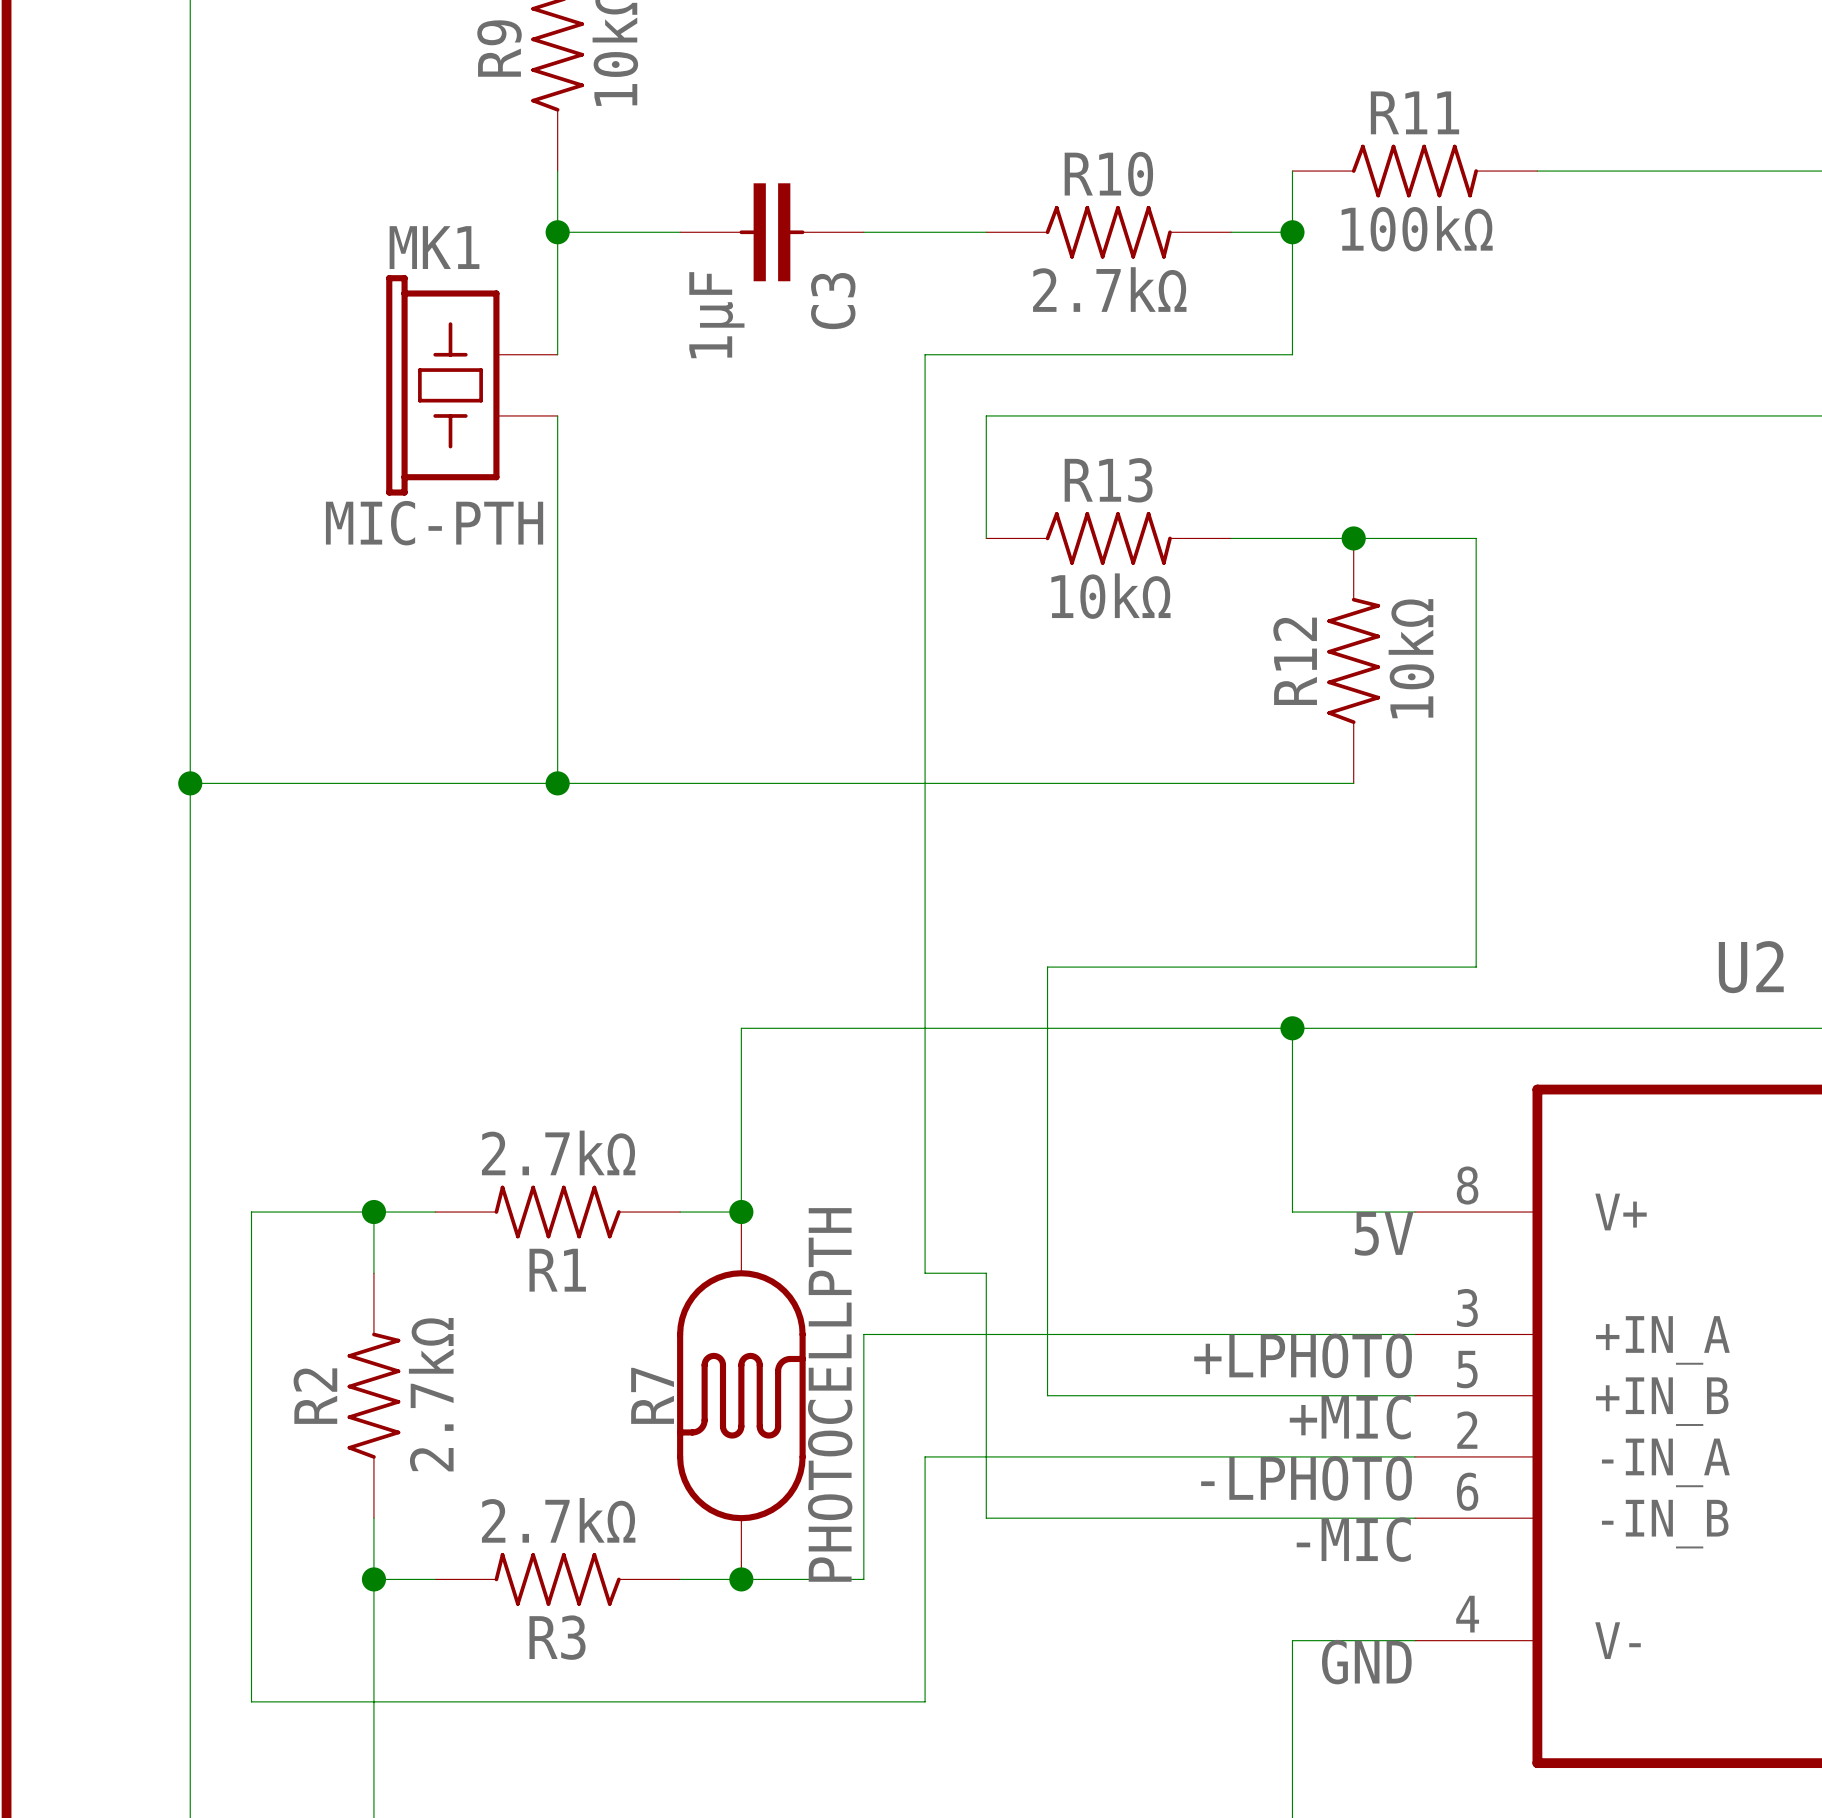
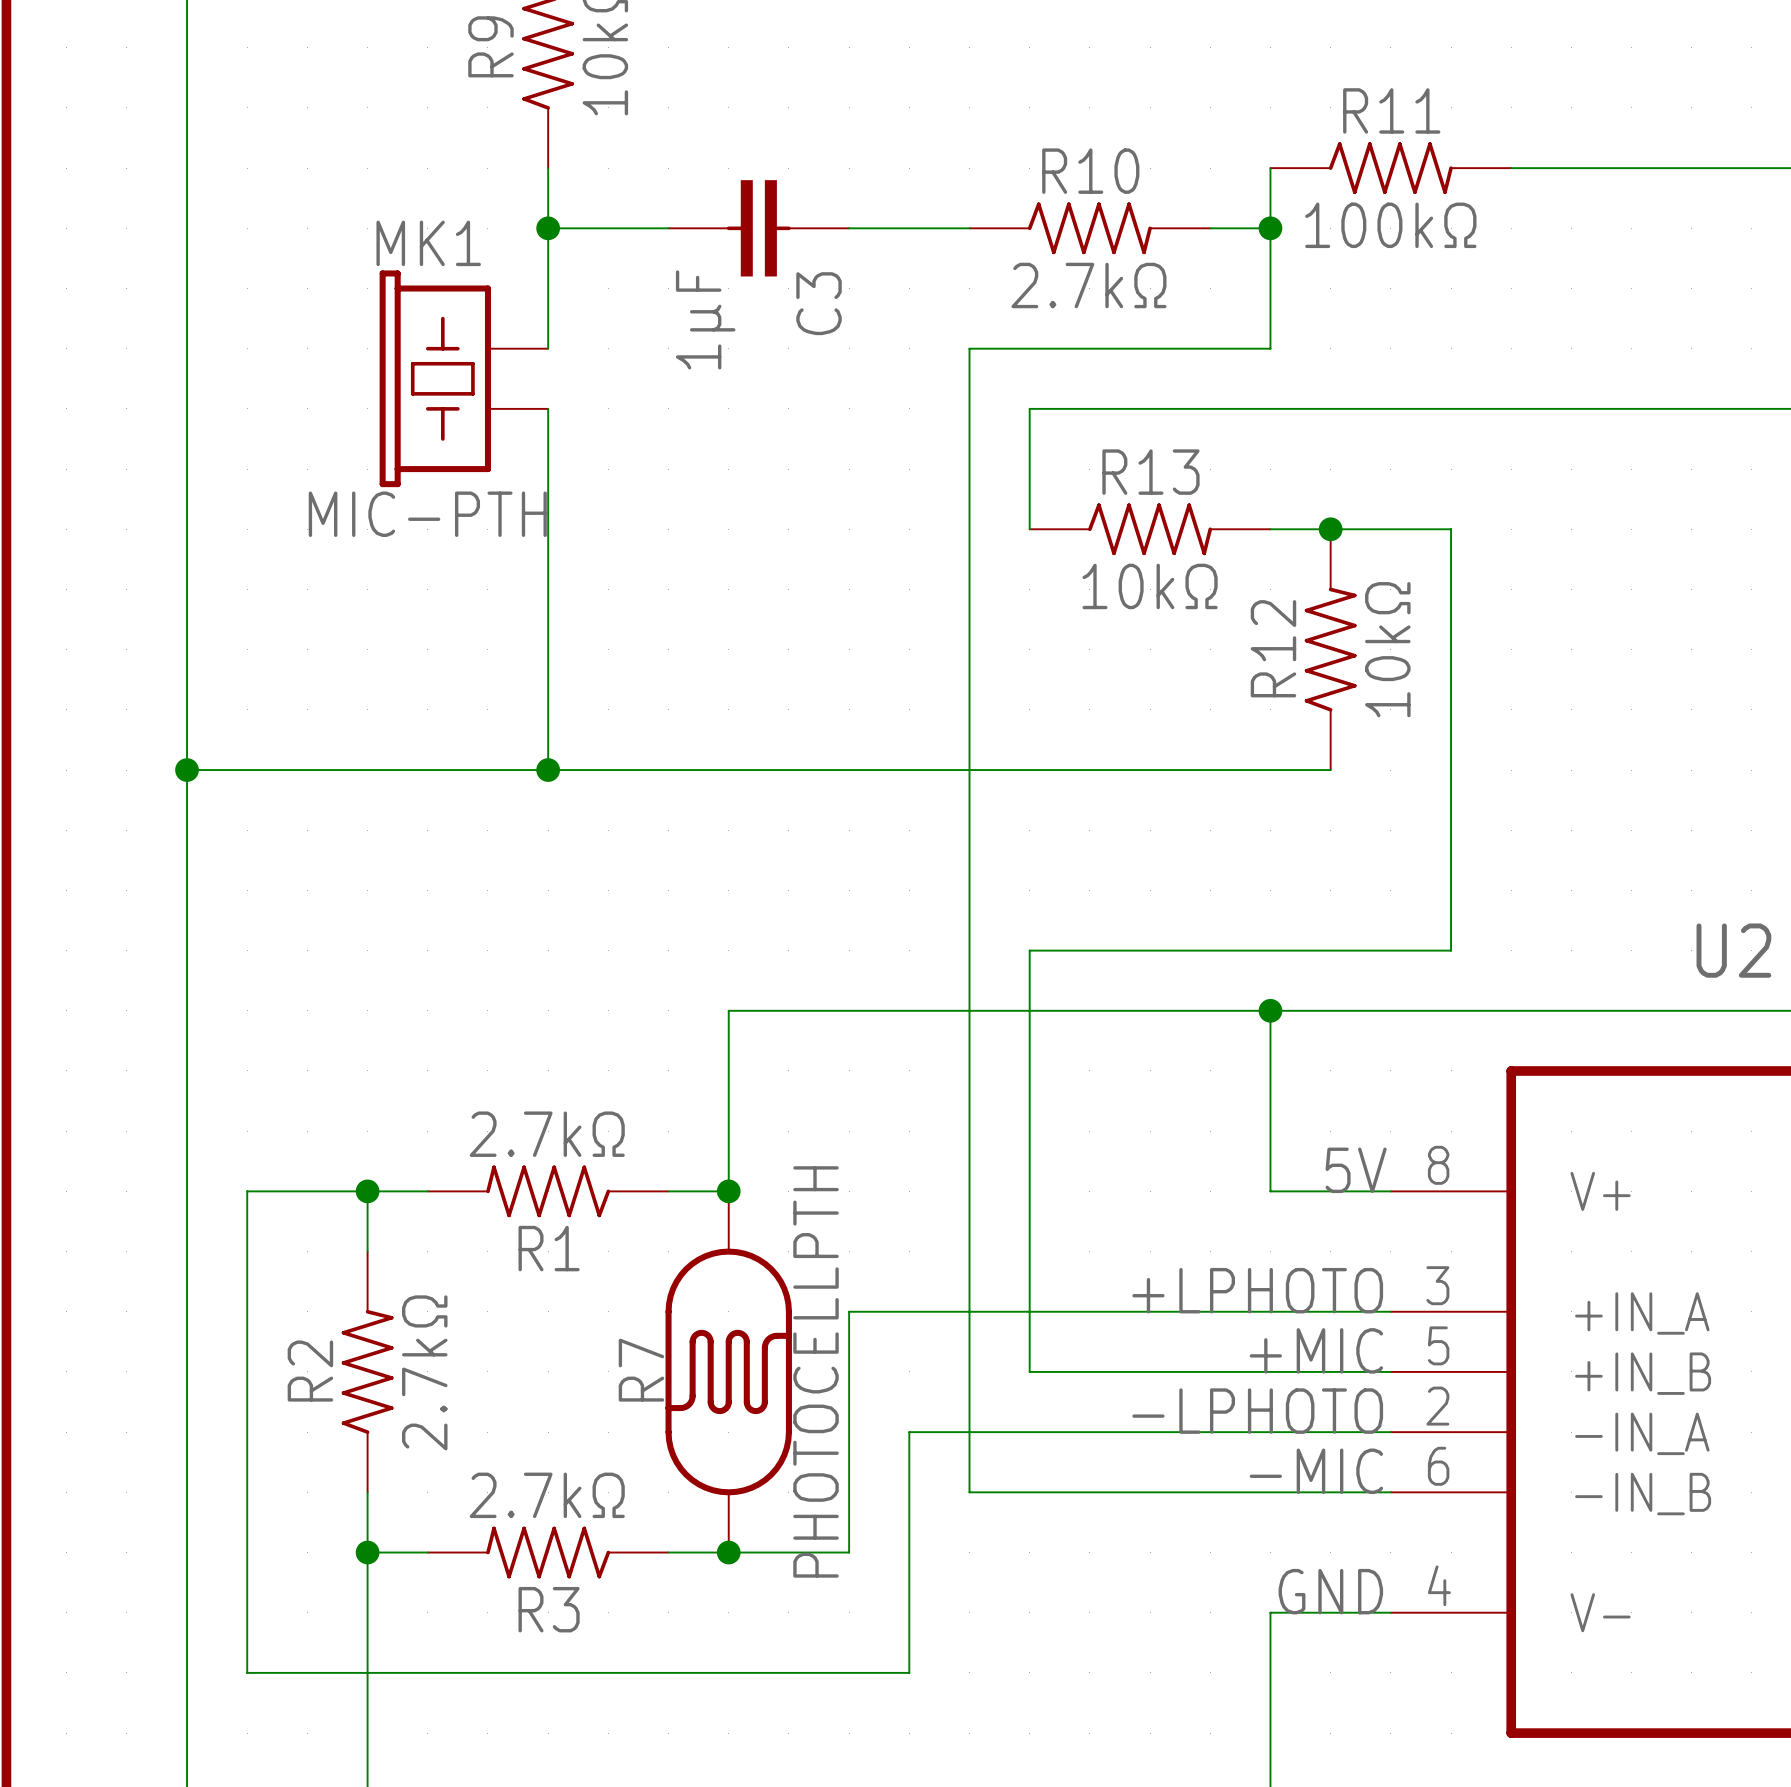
wire: (986, 354) (925, 354) (925, 1273) (986, 1273) -> (969, 529) (969, 1251)
wire: (986, 415) (1047, 415) -> (969, 408) (969, 348)
wire: none -> (1029, 408) (1029, 529)
R13 position: (1108, 538) -> (1150, 529)
label position: 5V (1384, 1233) -> 5V (1356, 1170)
label: none -> +LPHOTO (1257, 1290)
label: +LPHOTO (1303, 1355) -> +MIC (1316, 1350)
label: +MIC (1350, 1417) -> -LPHOTO (1257, 1411)
label: -LPHOTO (1306, 1478) -> -MIC (1316, 1471)
label: -MIC (1353, 1539) -> none
label position: GND (1366, 1662) -> GND (1330, 1591)

